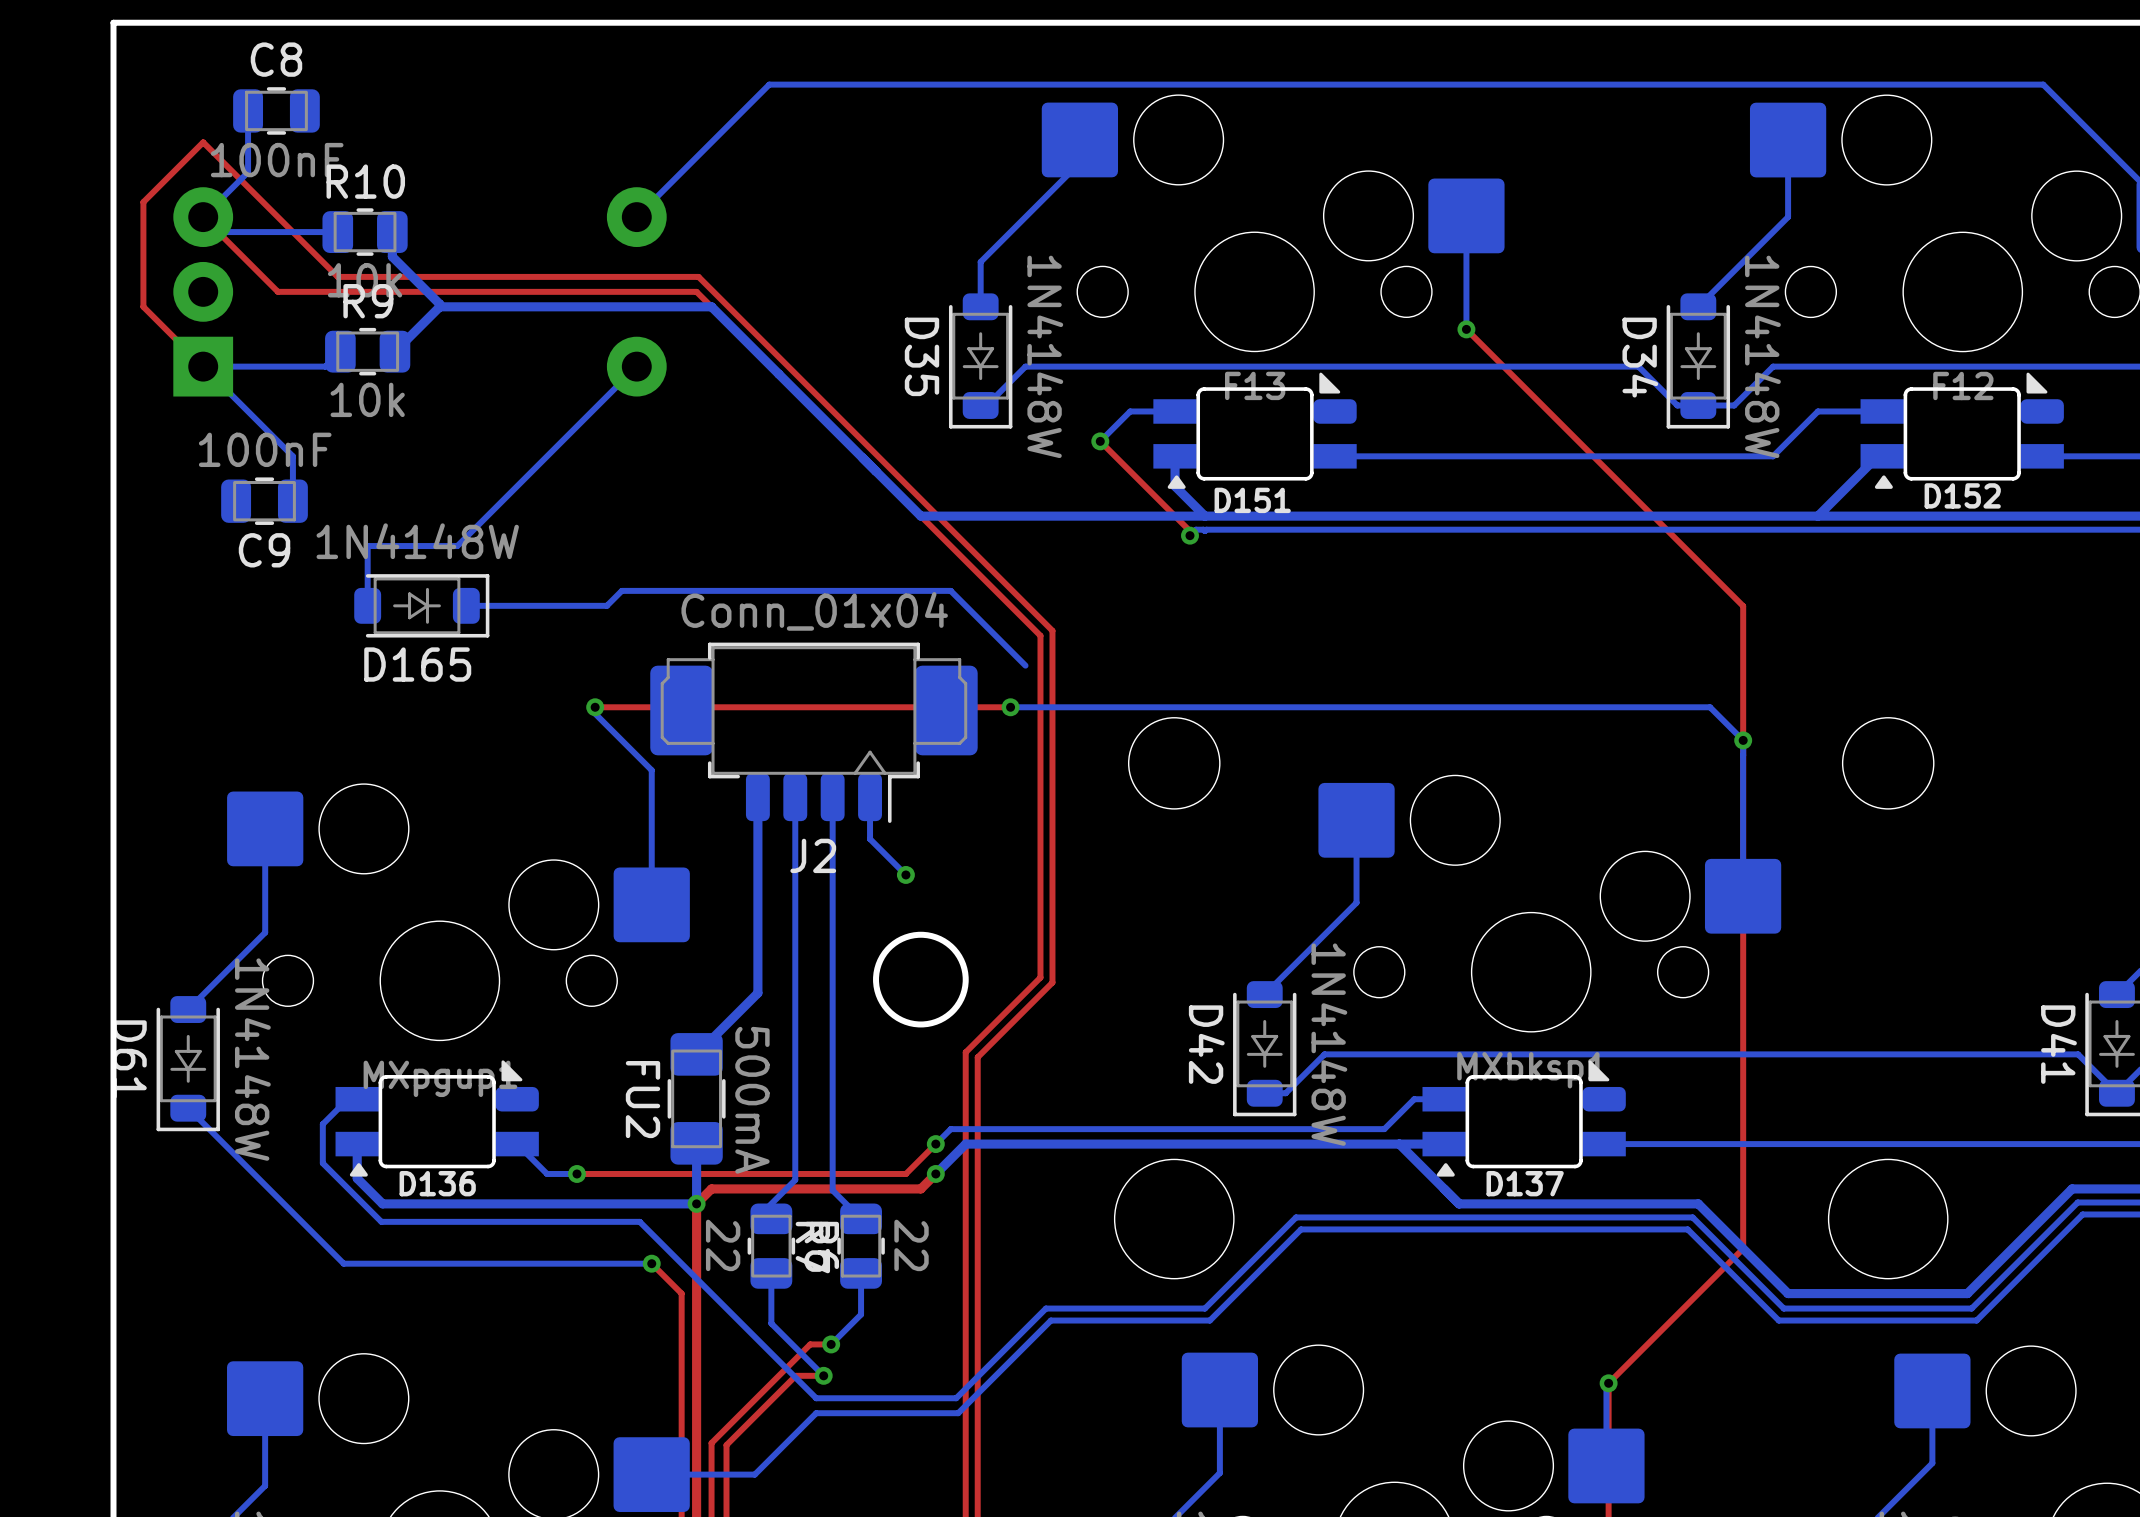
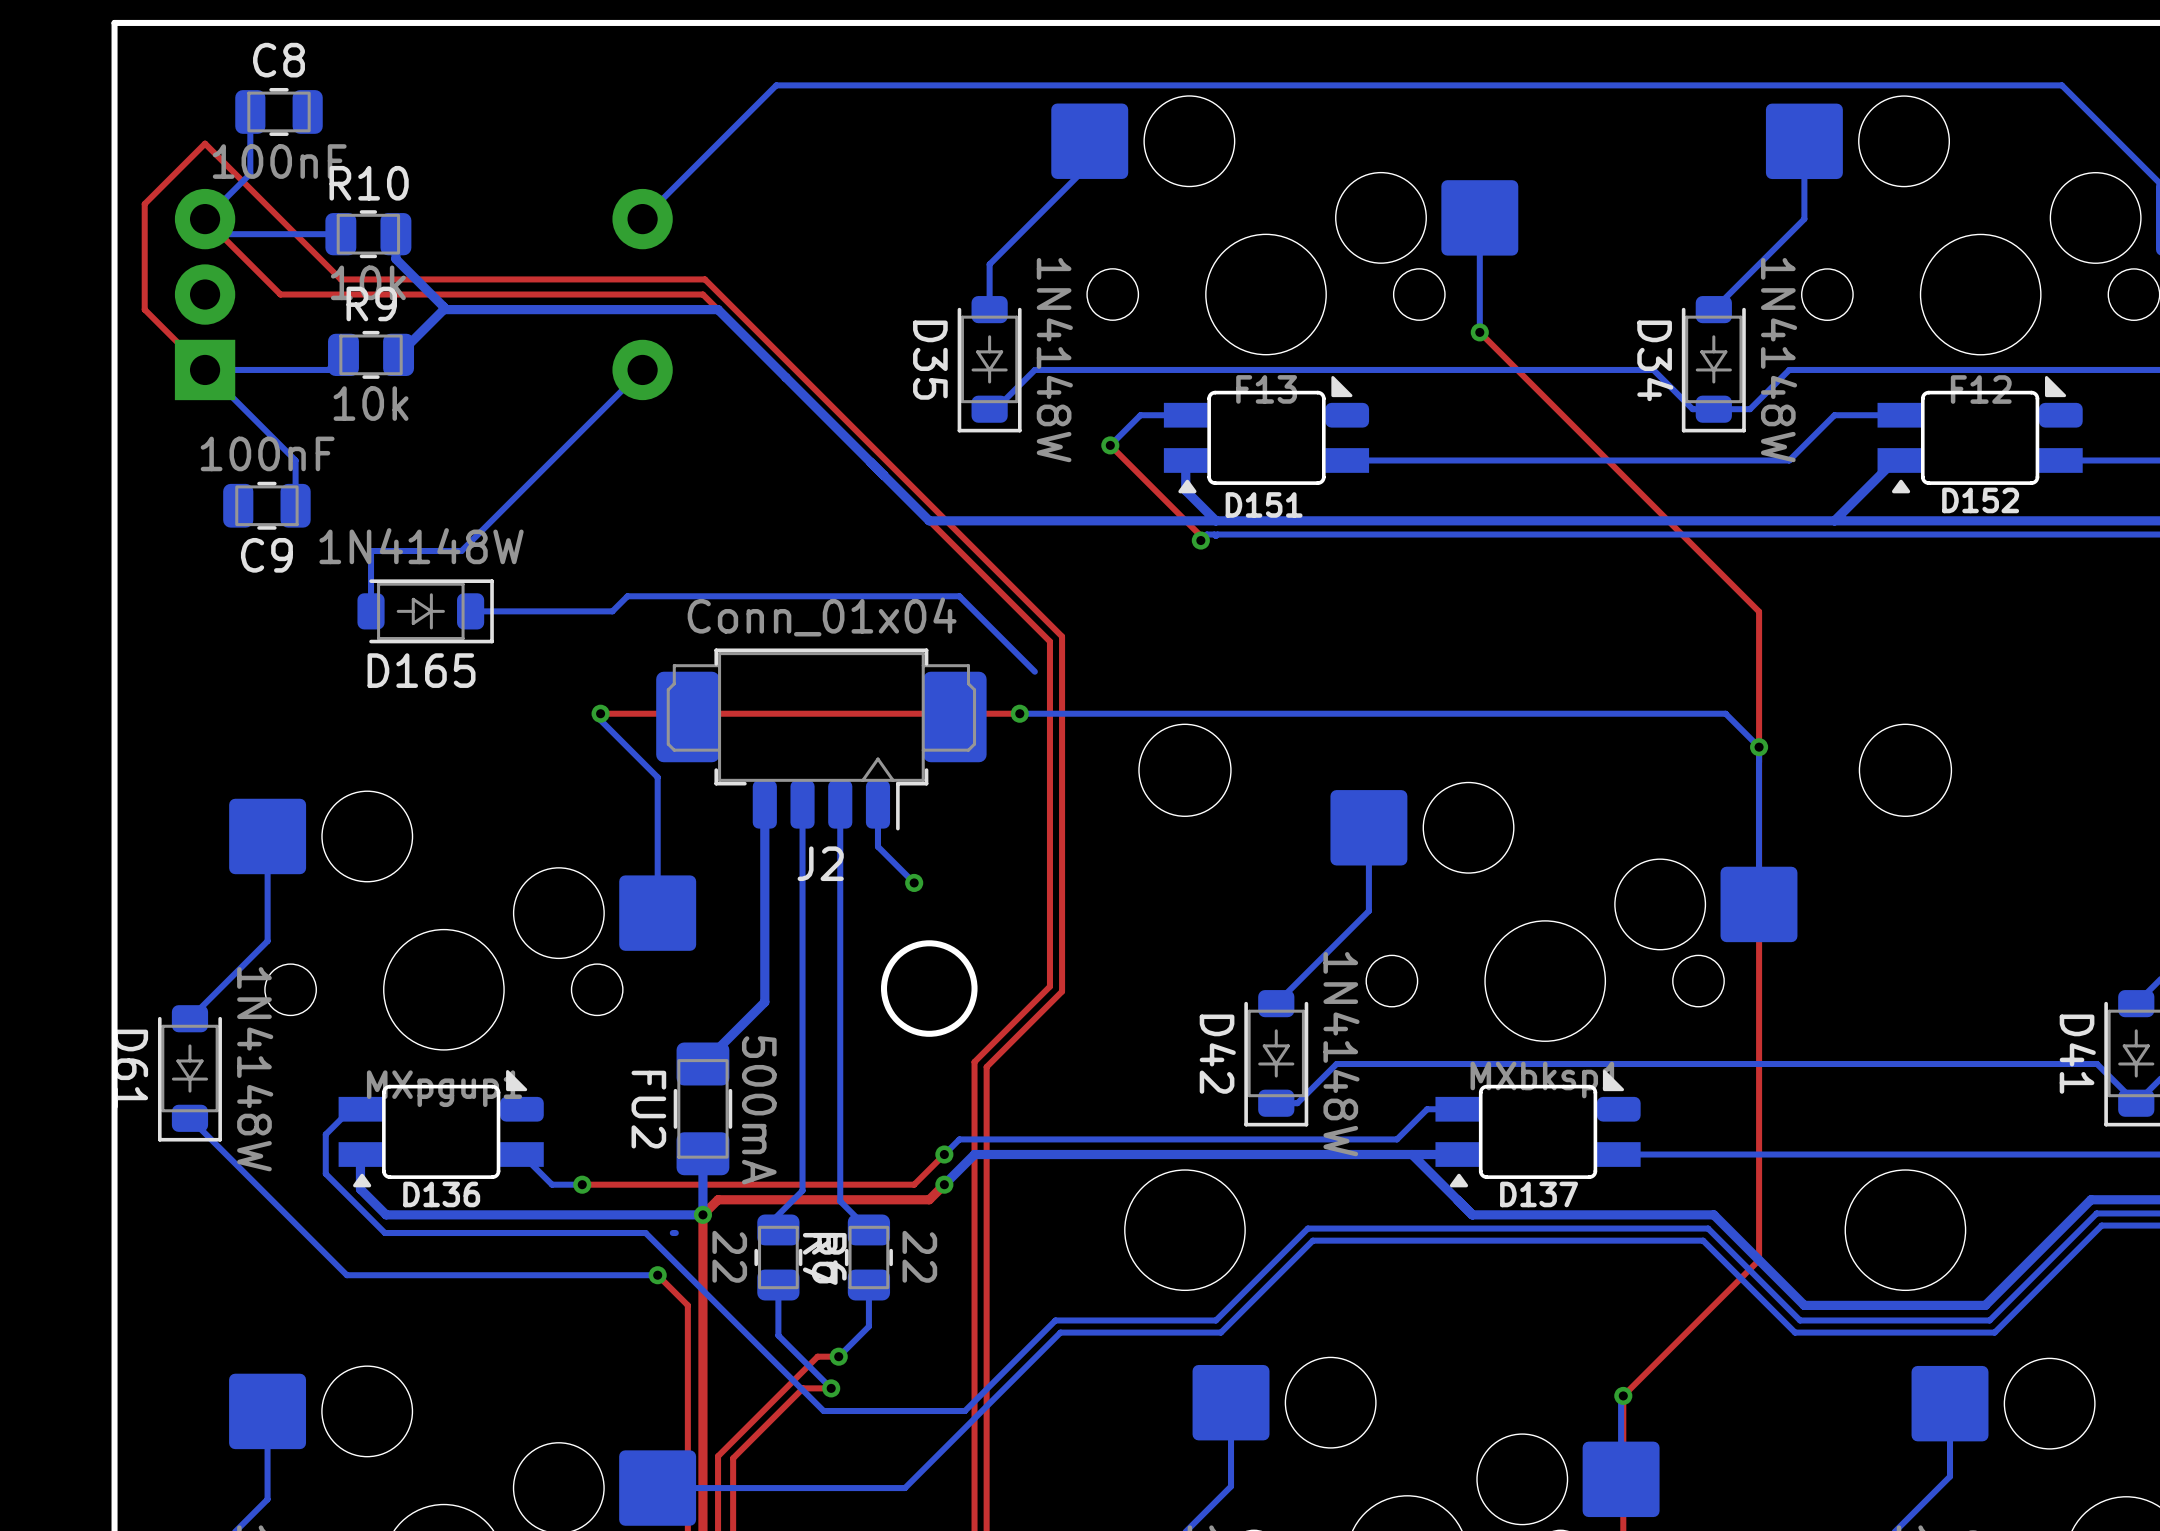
bottom track: none -> (675, 1233) (672, 1233)
bottom track: (958, 1413) (816, 1413) (754, 1474) -> (966, 1426) (905, 1488) (761, 1488)

